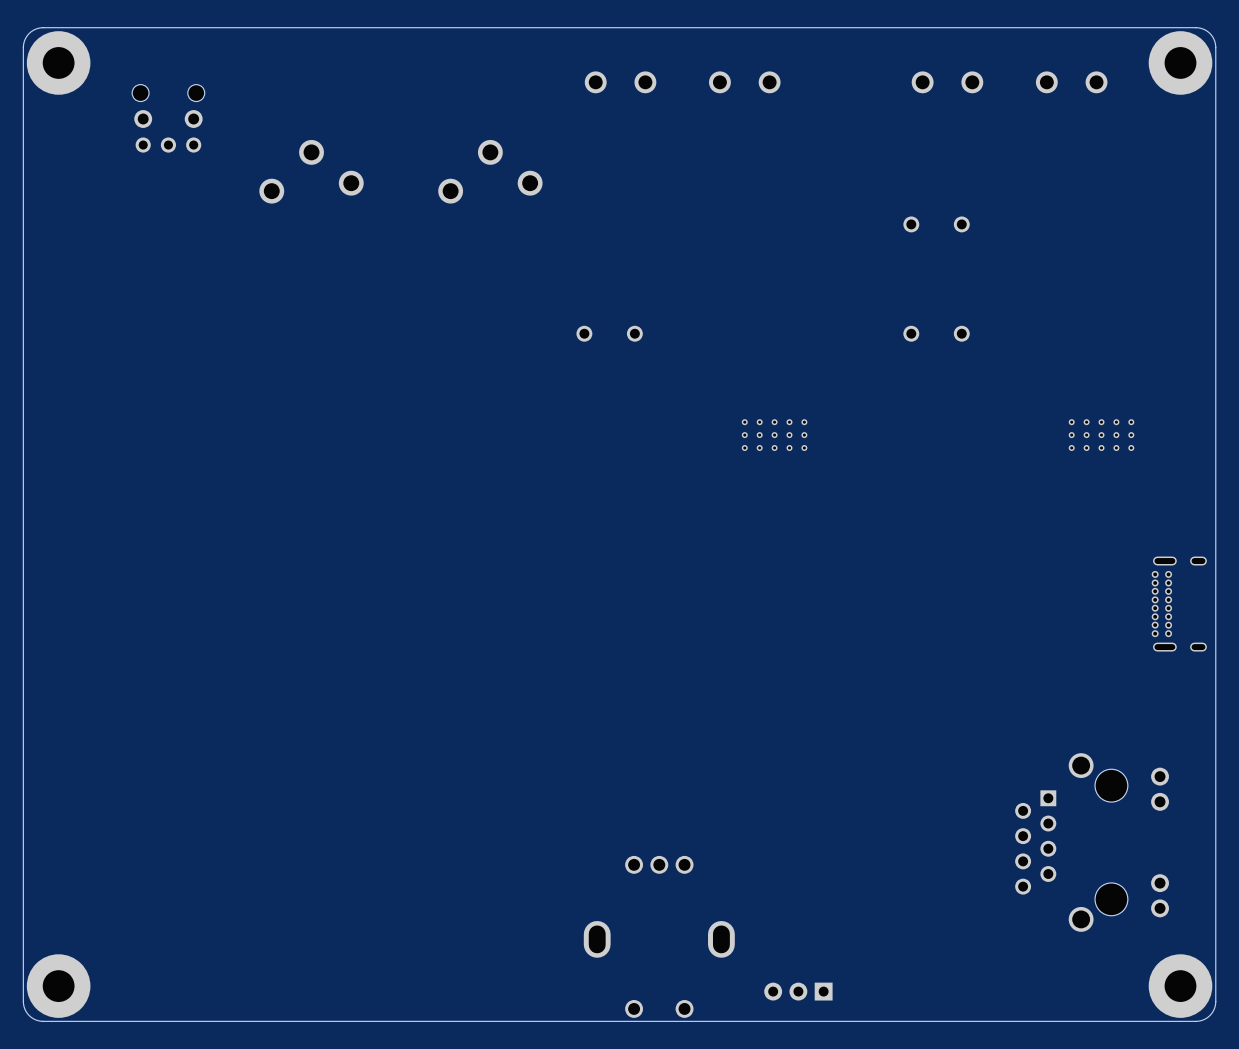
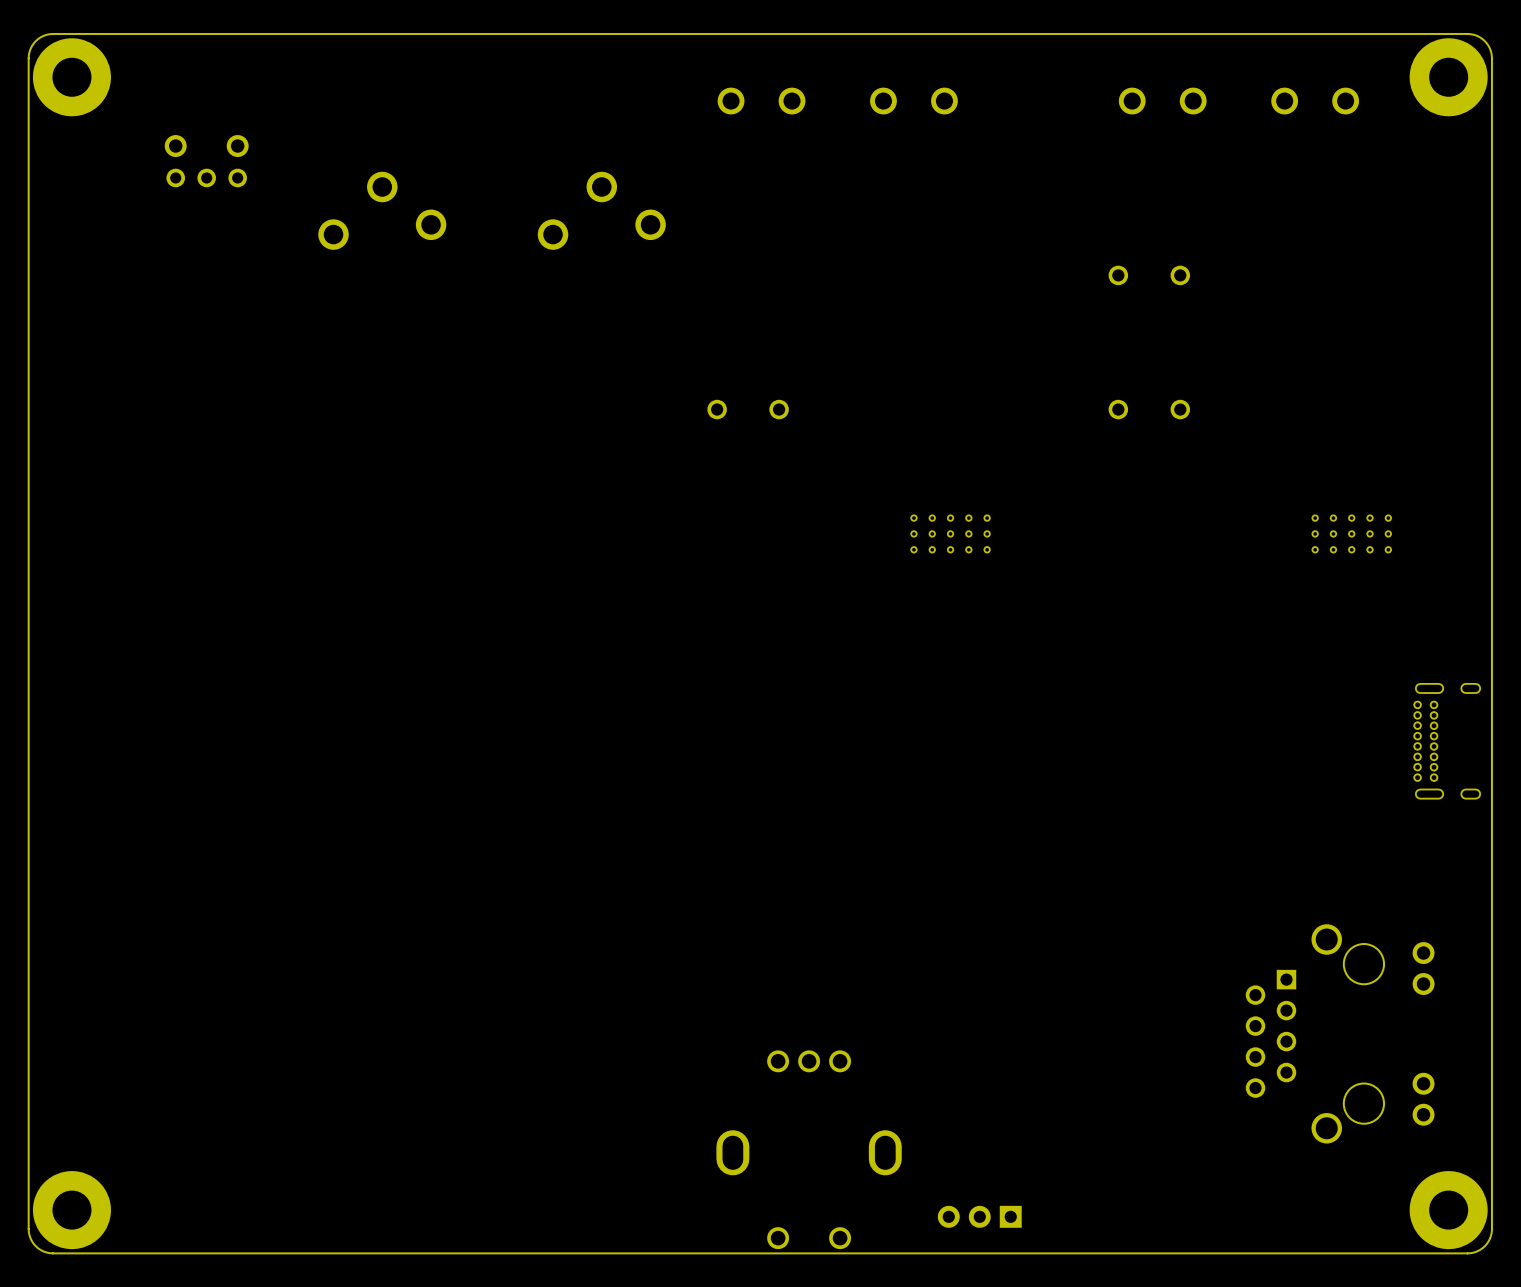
part: (168, 118) -> none

